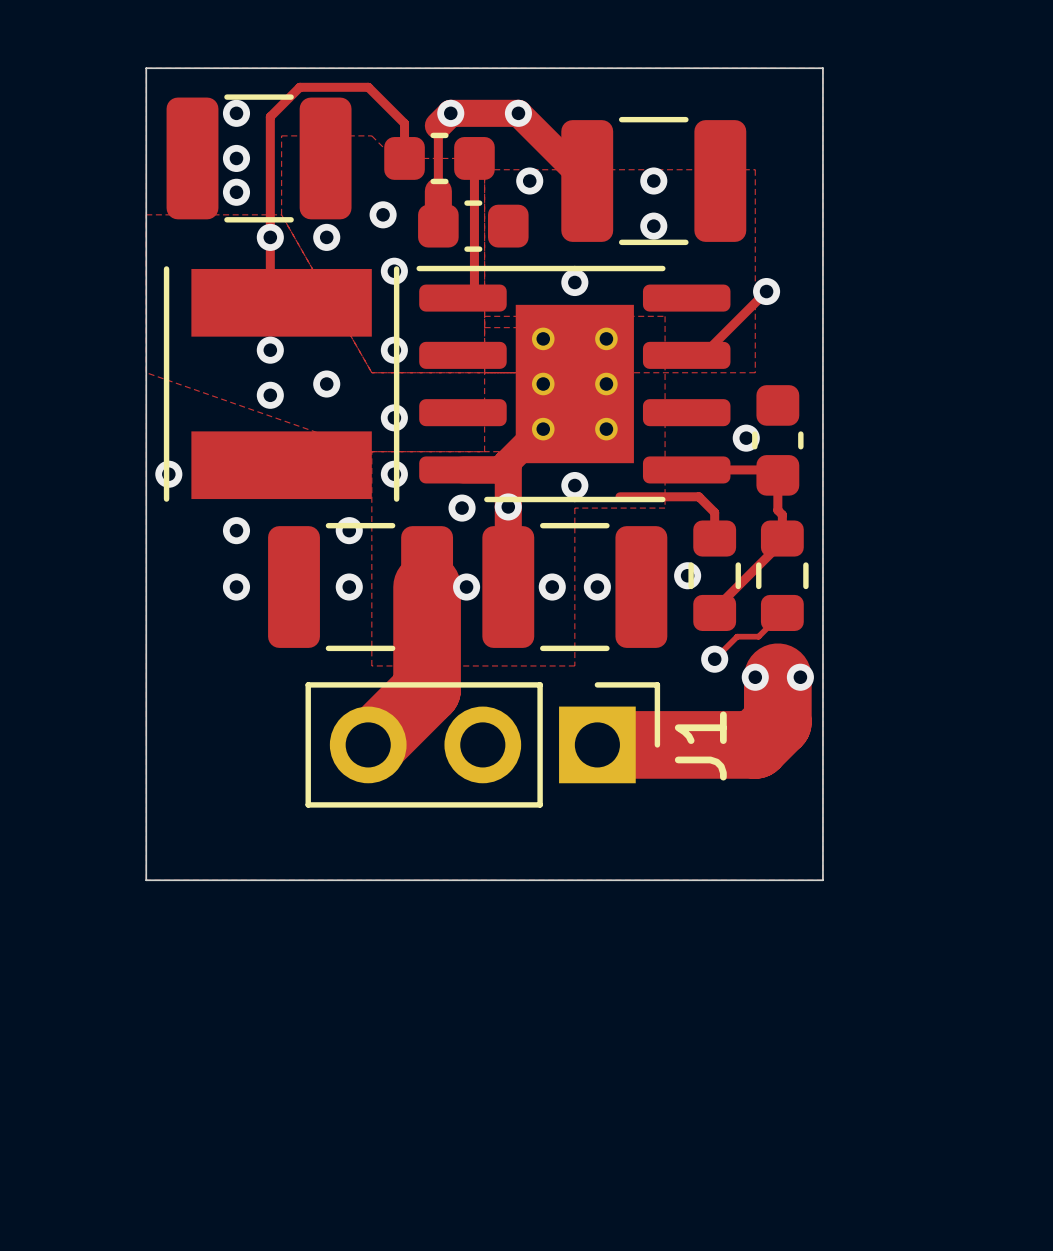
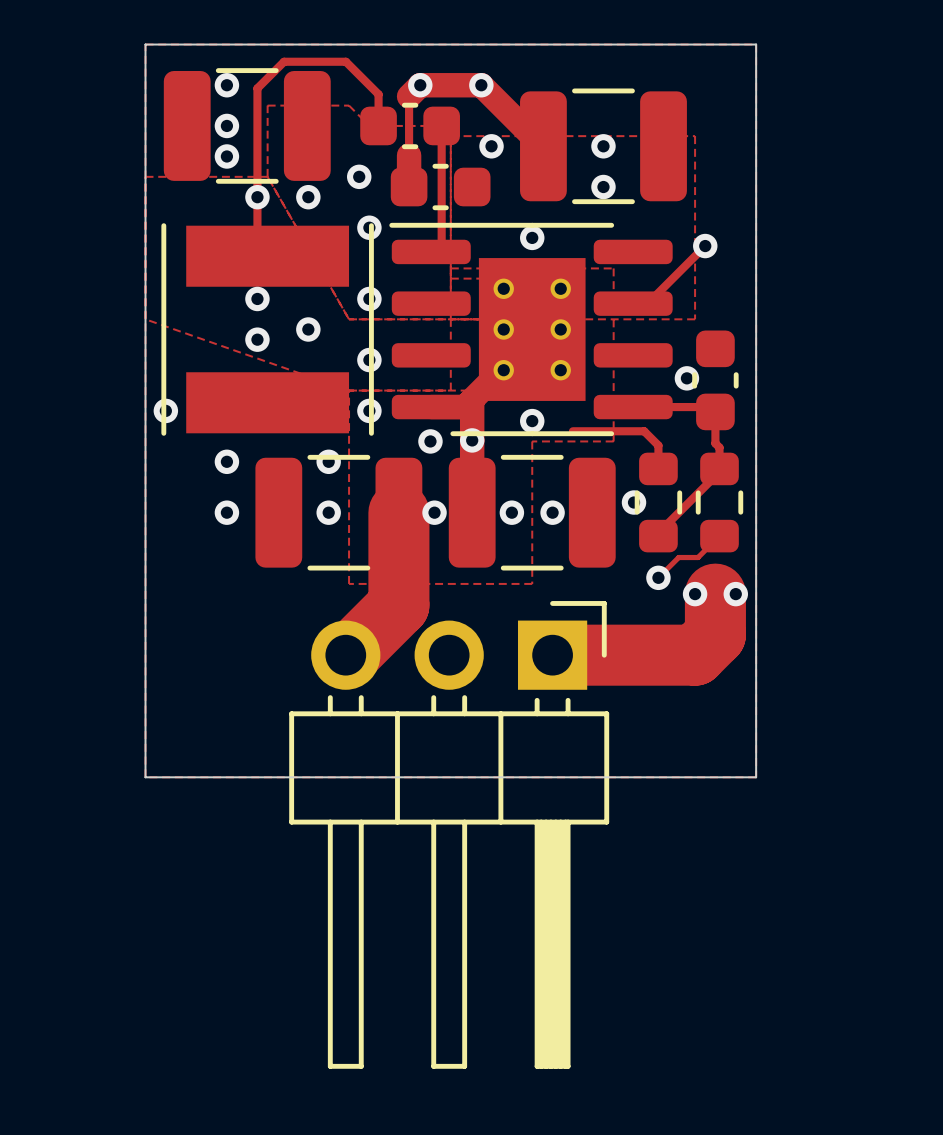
J1: (482, 744) -> none
part: none -> (449, 834)

